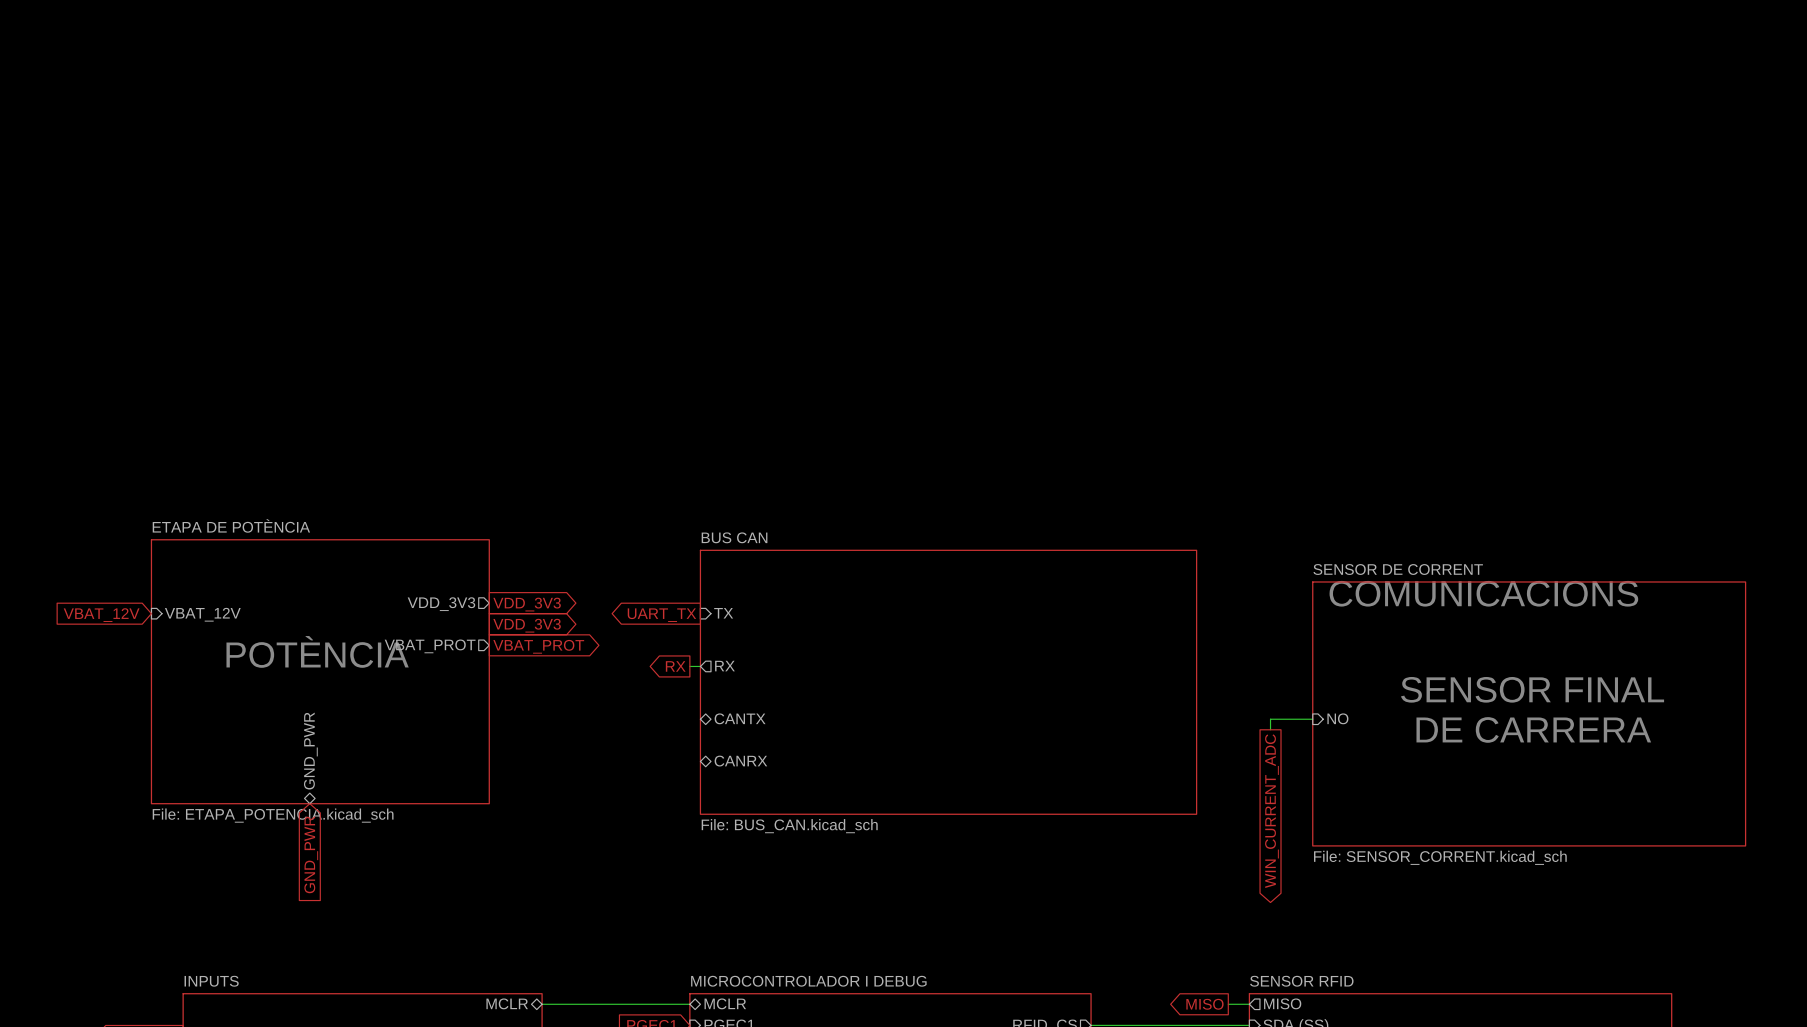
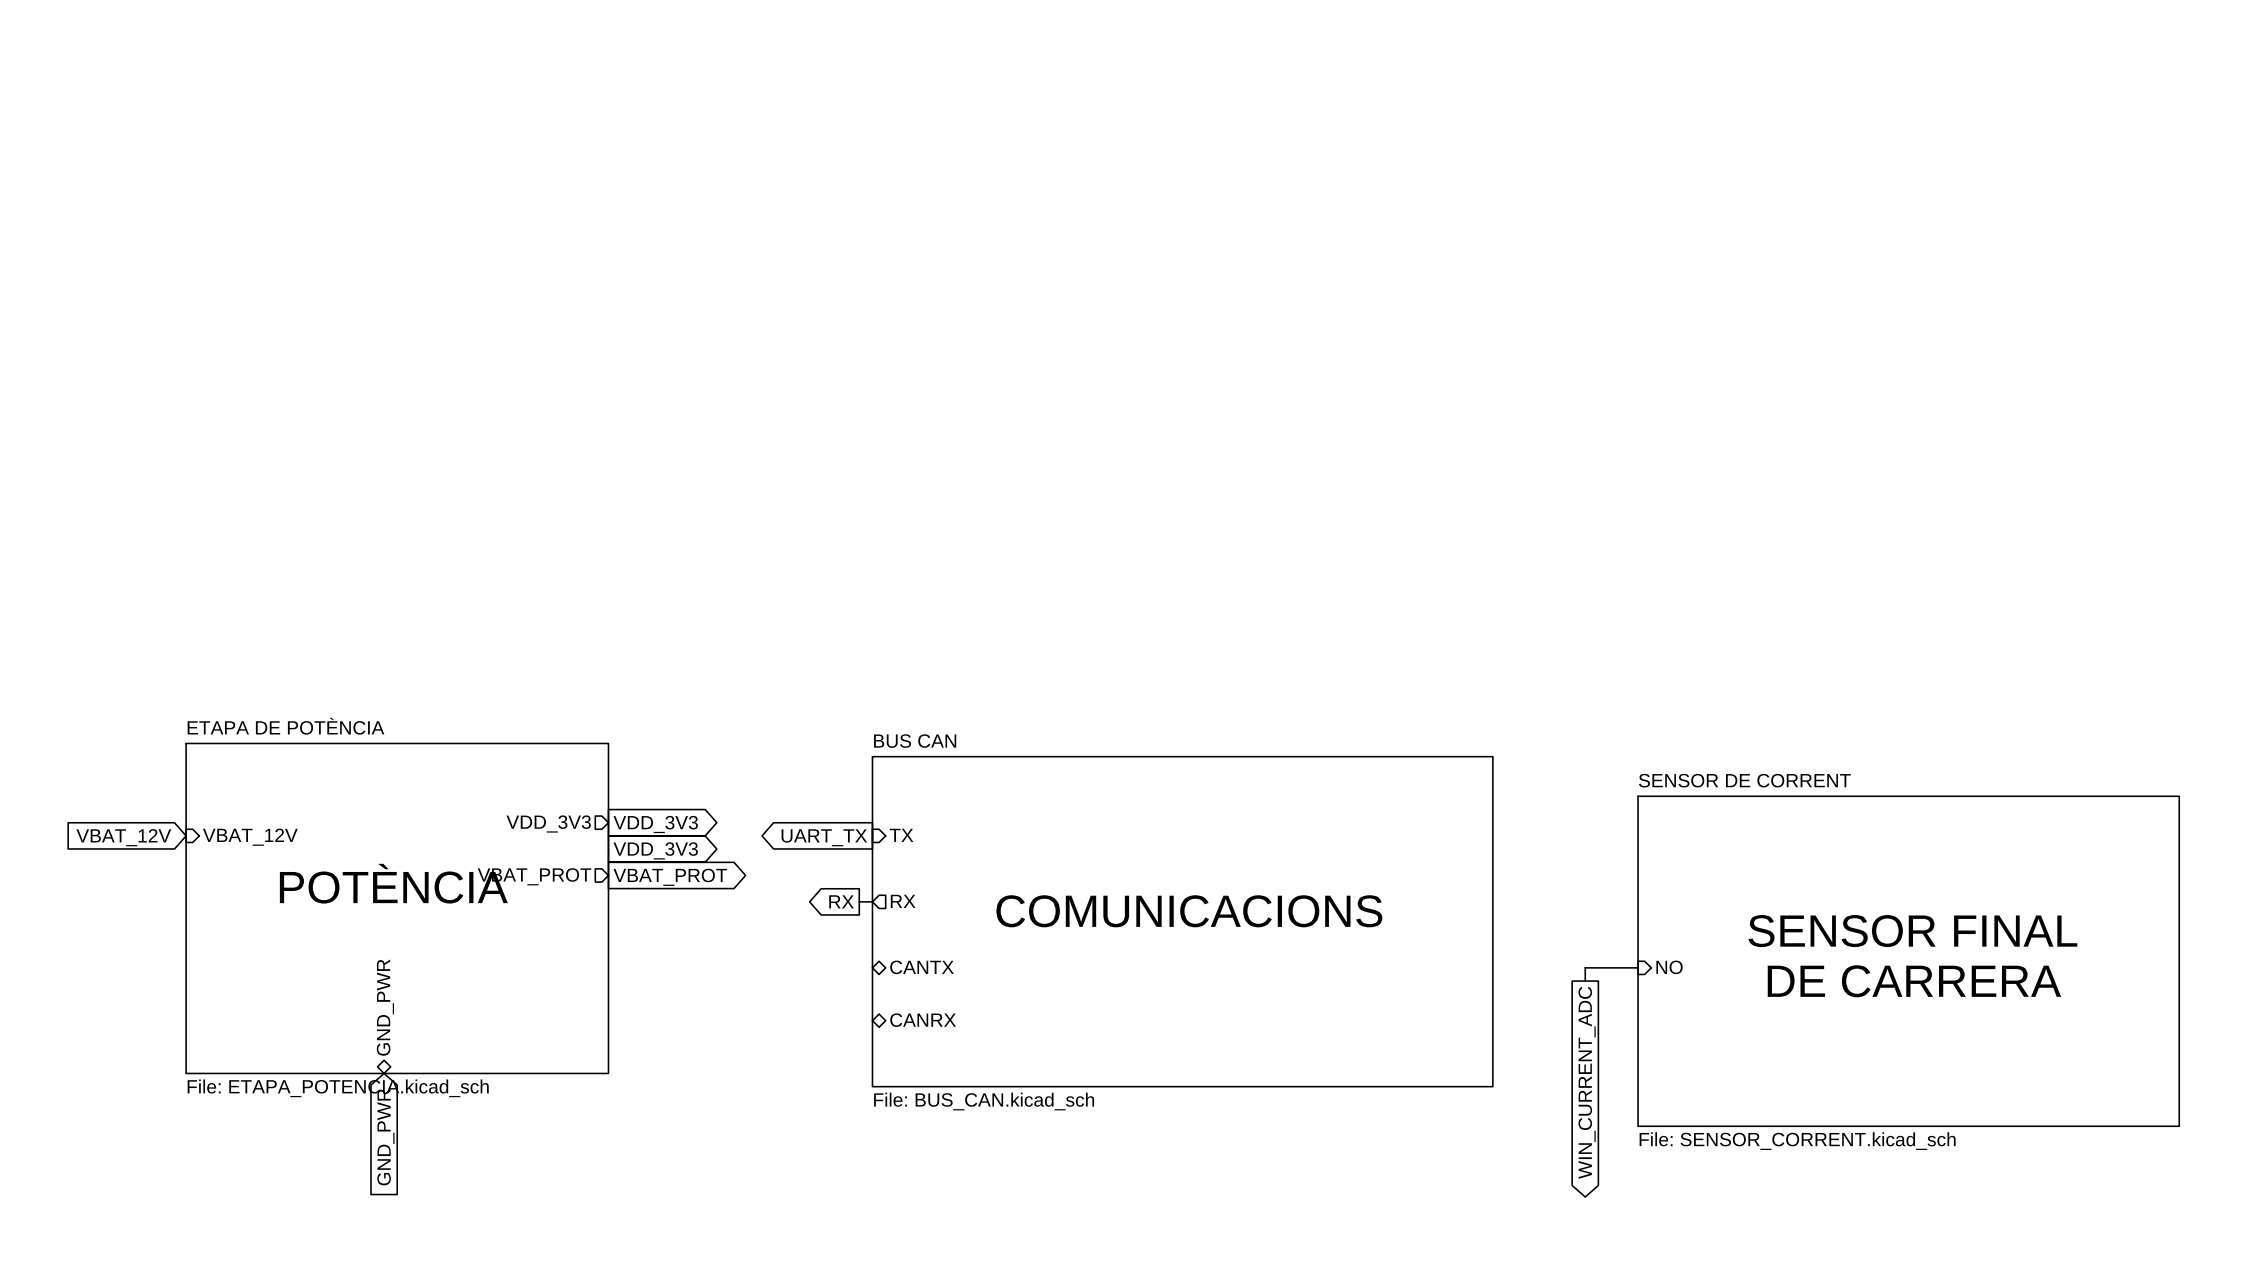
text: COMUNICACIONS (1483, 593) -> none
text: none -> COMUNICACIONS (1189, 911)

